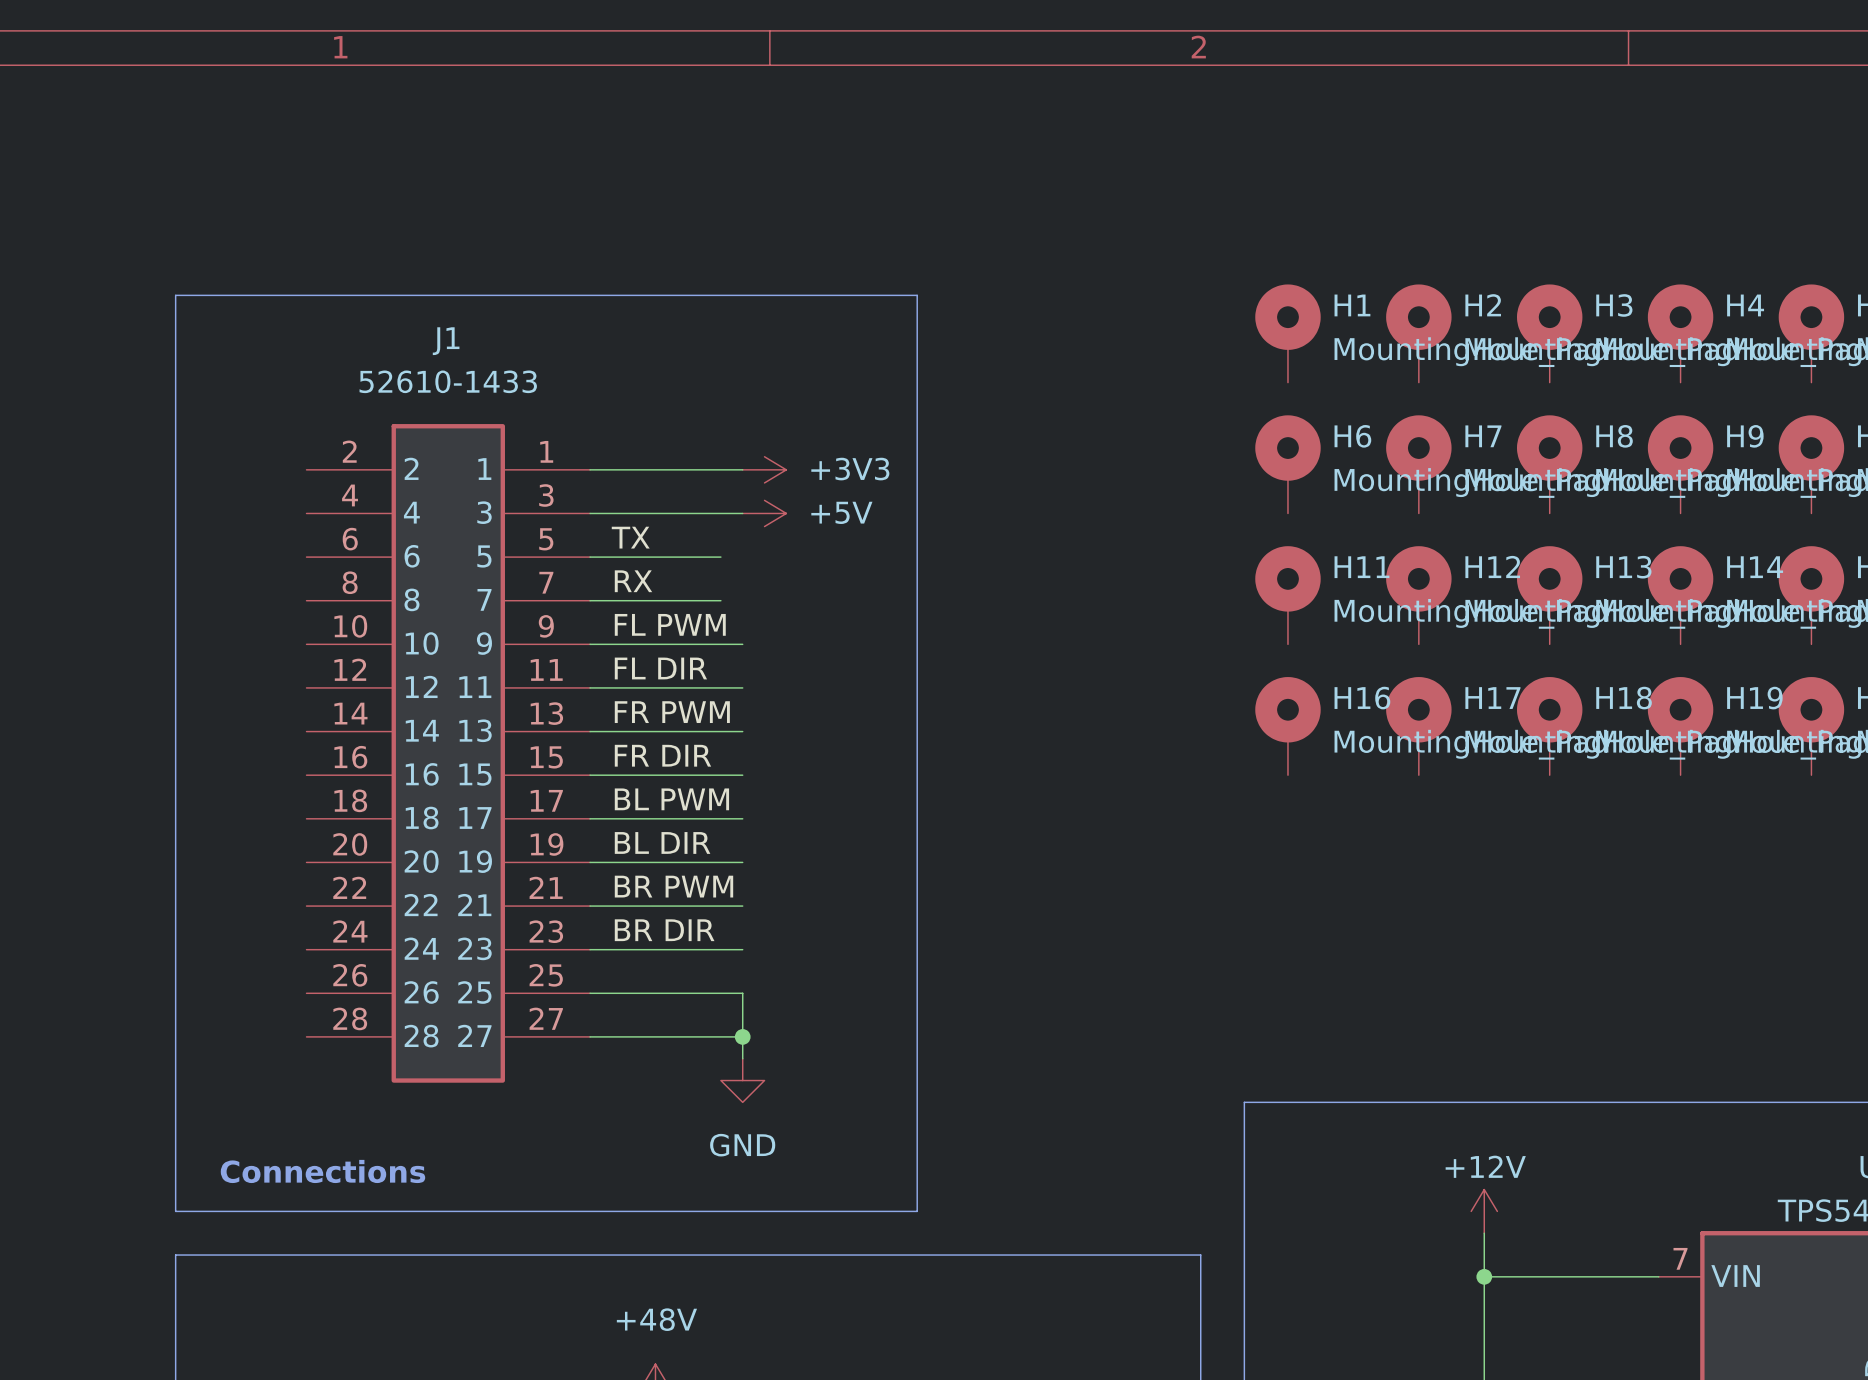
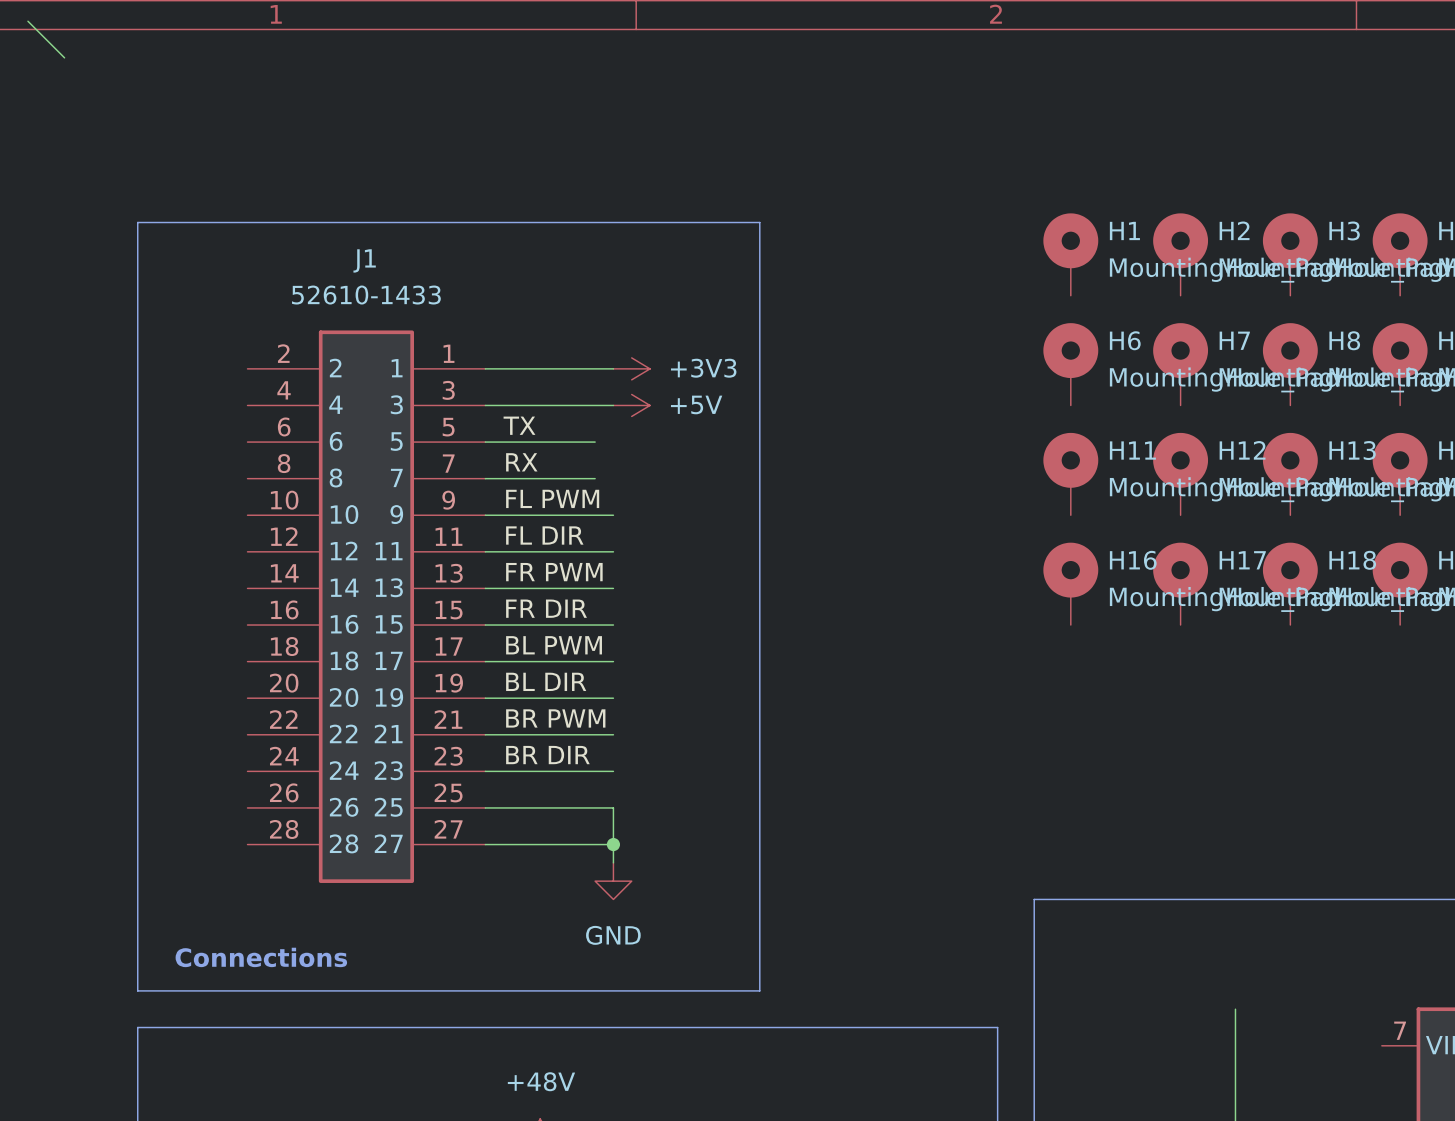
wire: none -> (27, 21) (64, 57)
power symbol: +12V (1484, 1211) -> none
wire: (1484, 1276) (1658, 1276) -> none
junction: (1484, 1276) -> none

